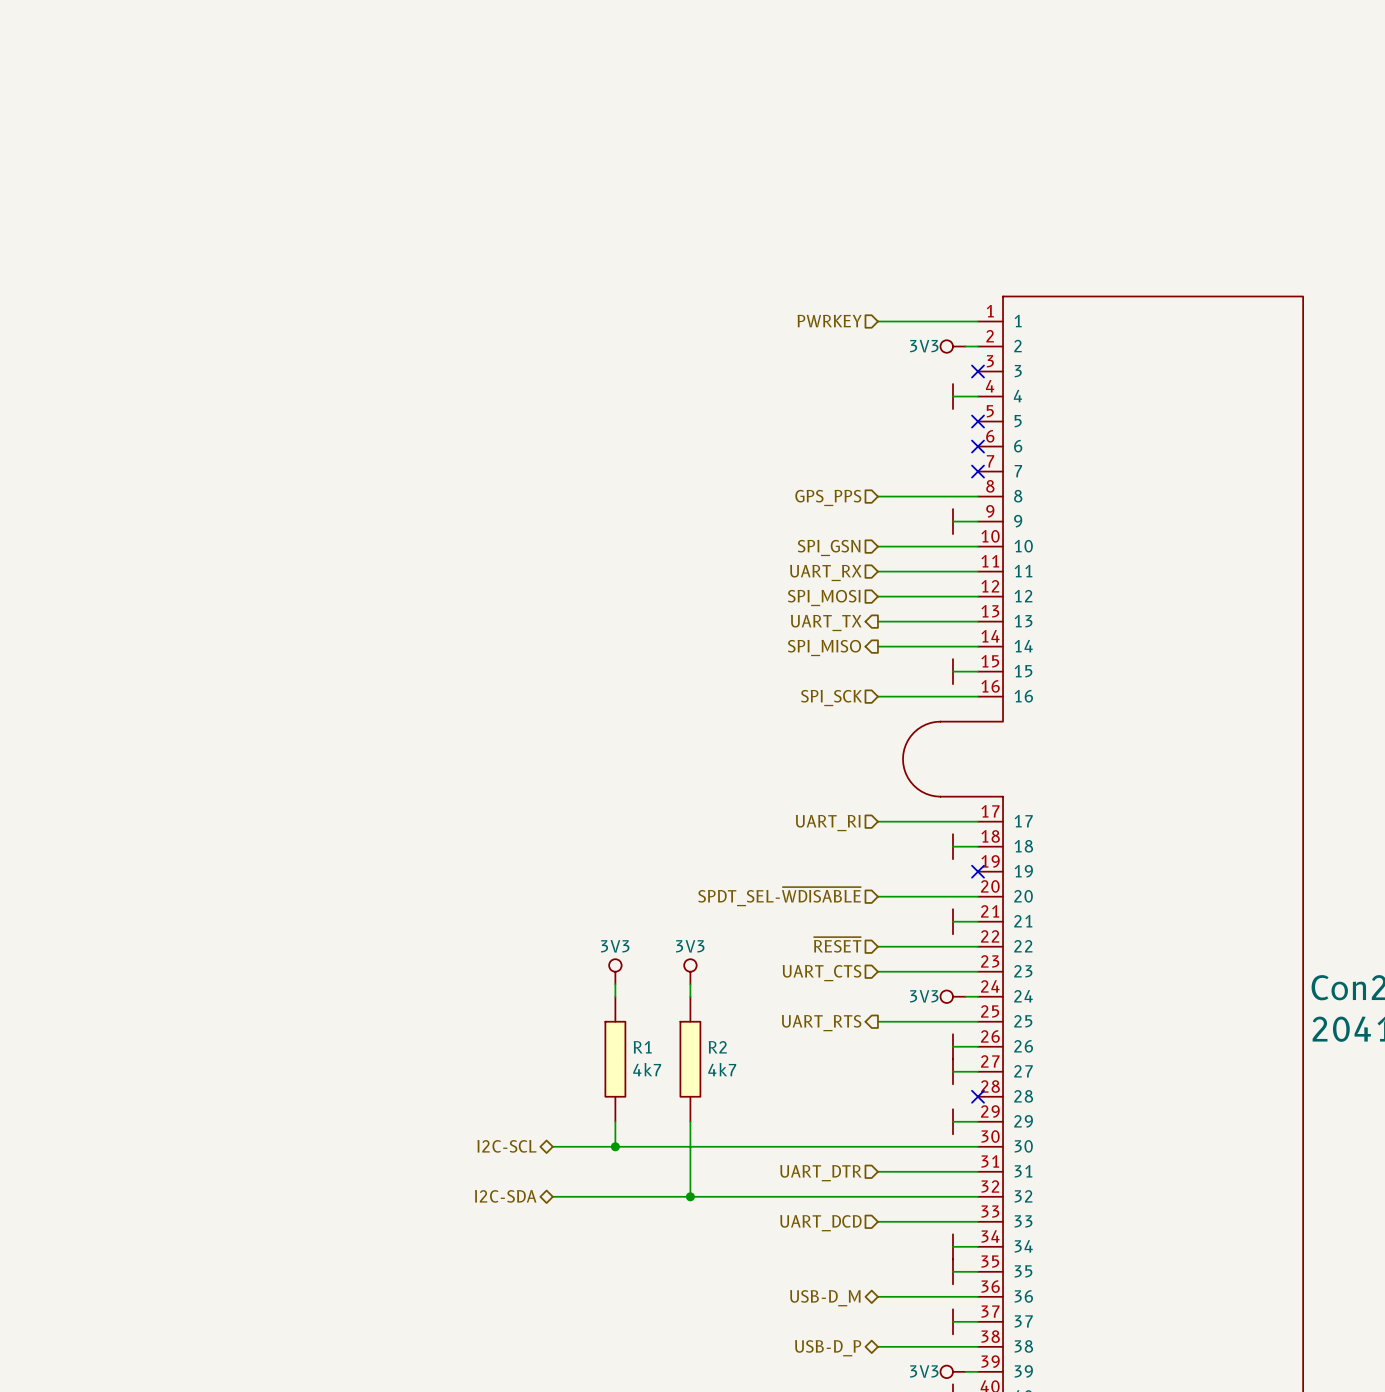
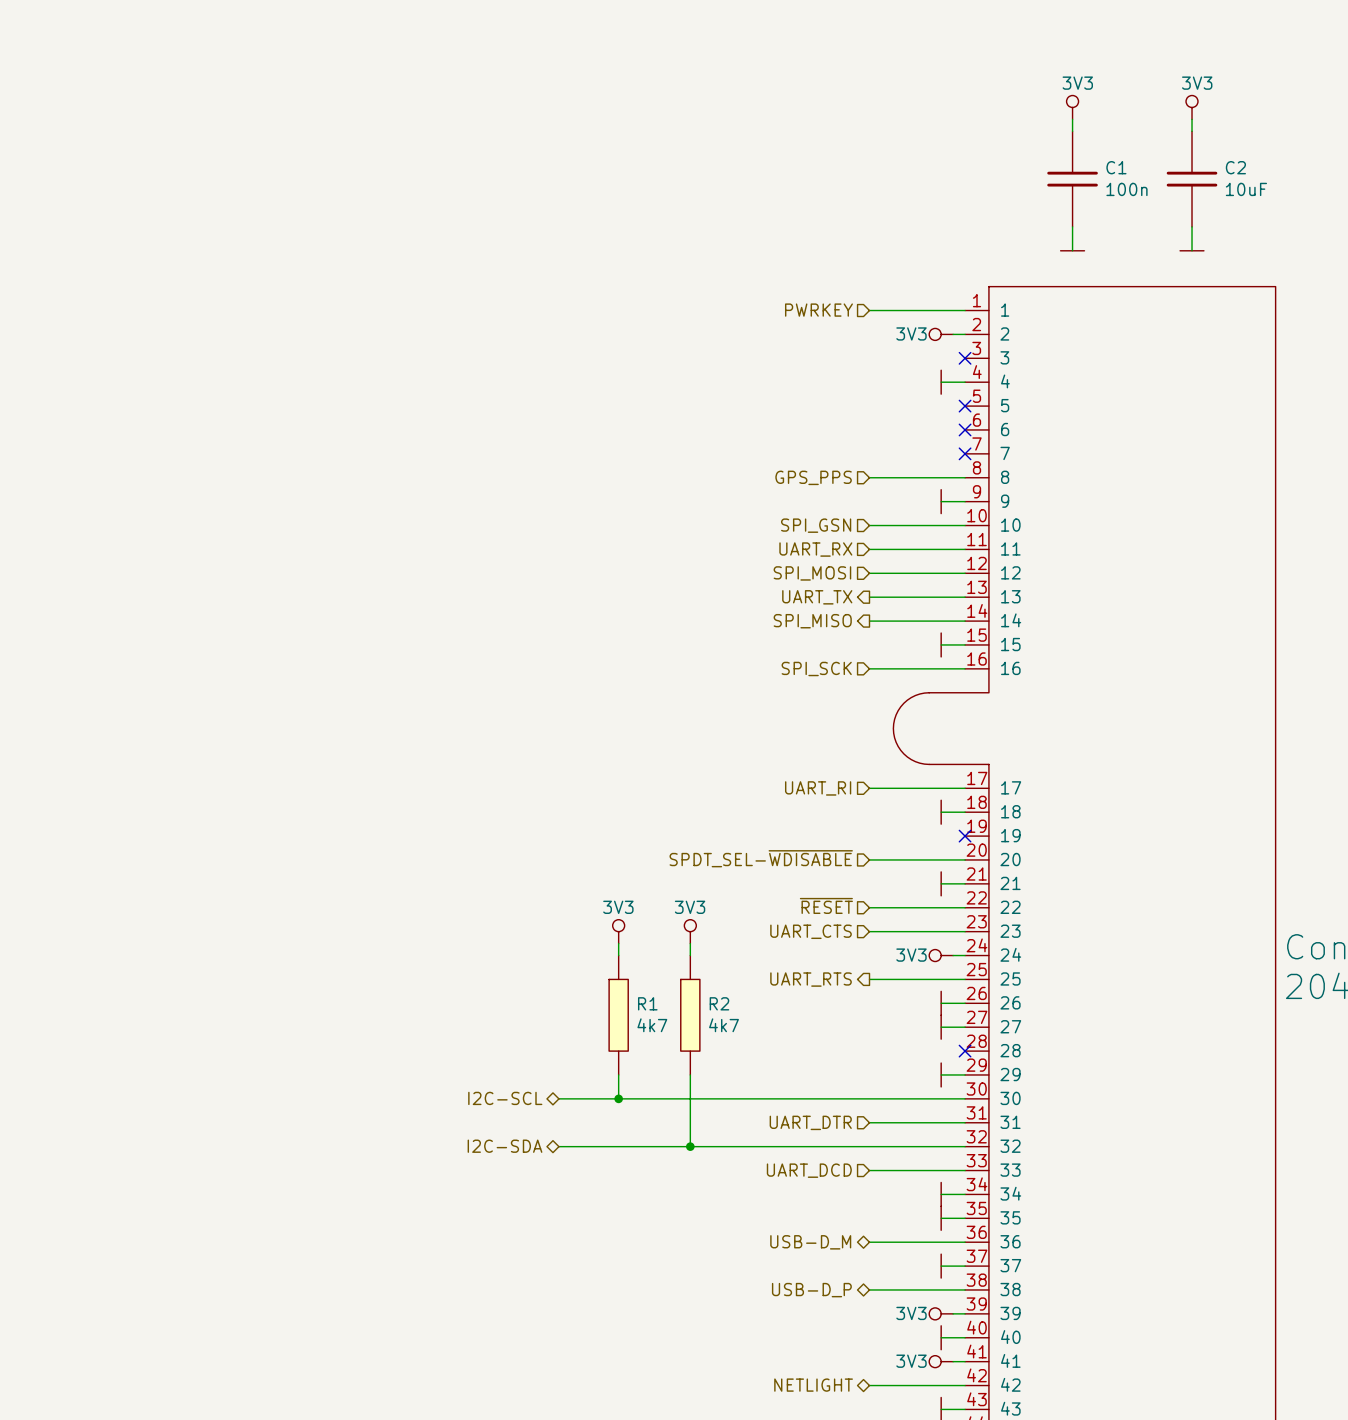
power symbol: none -> 3V3 (1072, 107)
power symbol: none -> 3V3 (1192, 107)
wire: none -> (1072, 119) (1072, 131)
wire: none -> (1192, 119) (1192, 131)
C1: none -> 100n (1072, 179)
C2: none -> 10uF (1192, 179)
wire: none -> (1072, 226) (1072, 250)
wire: none -> (1192, 226) (1192, 250)
power symbol: none -> (1072, 250)
power symbol: none -> (1192, 250)

